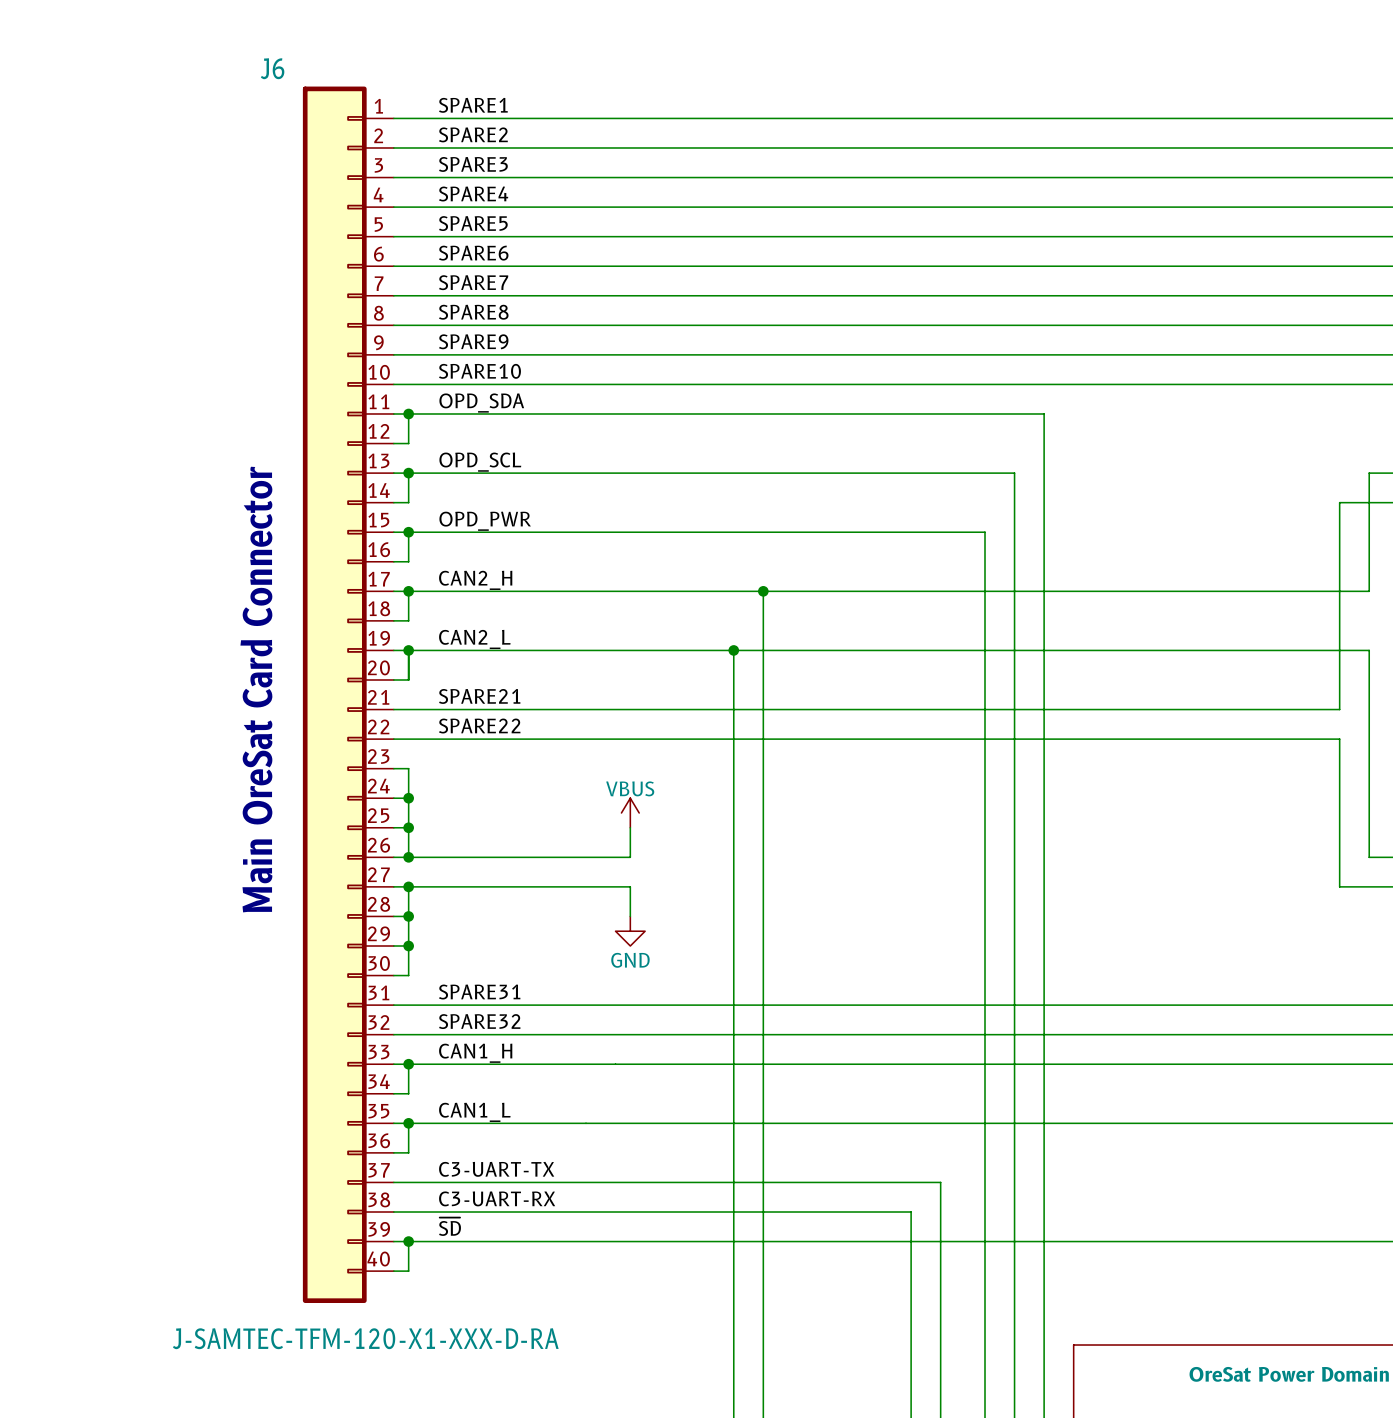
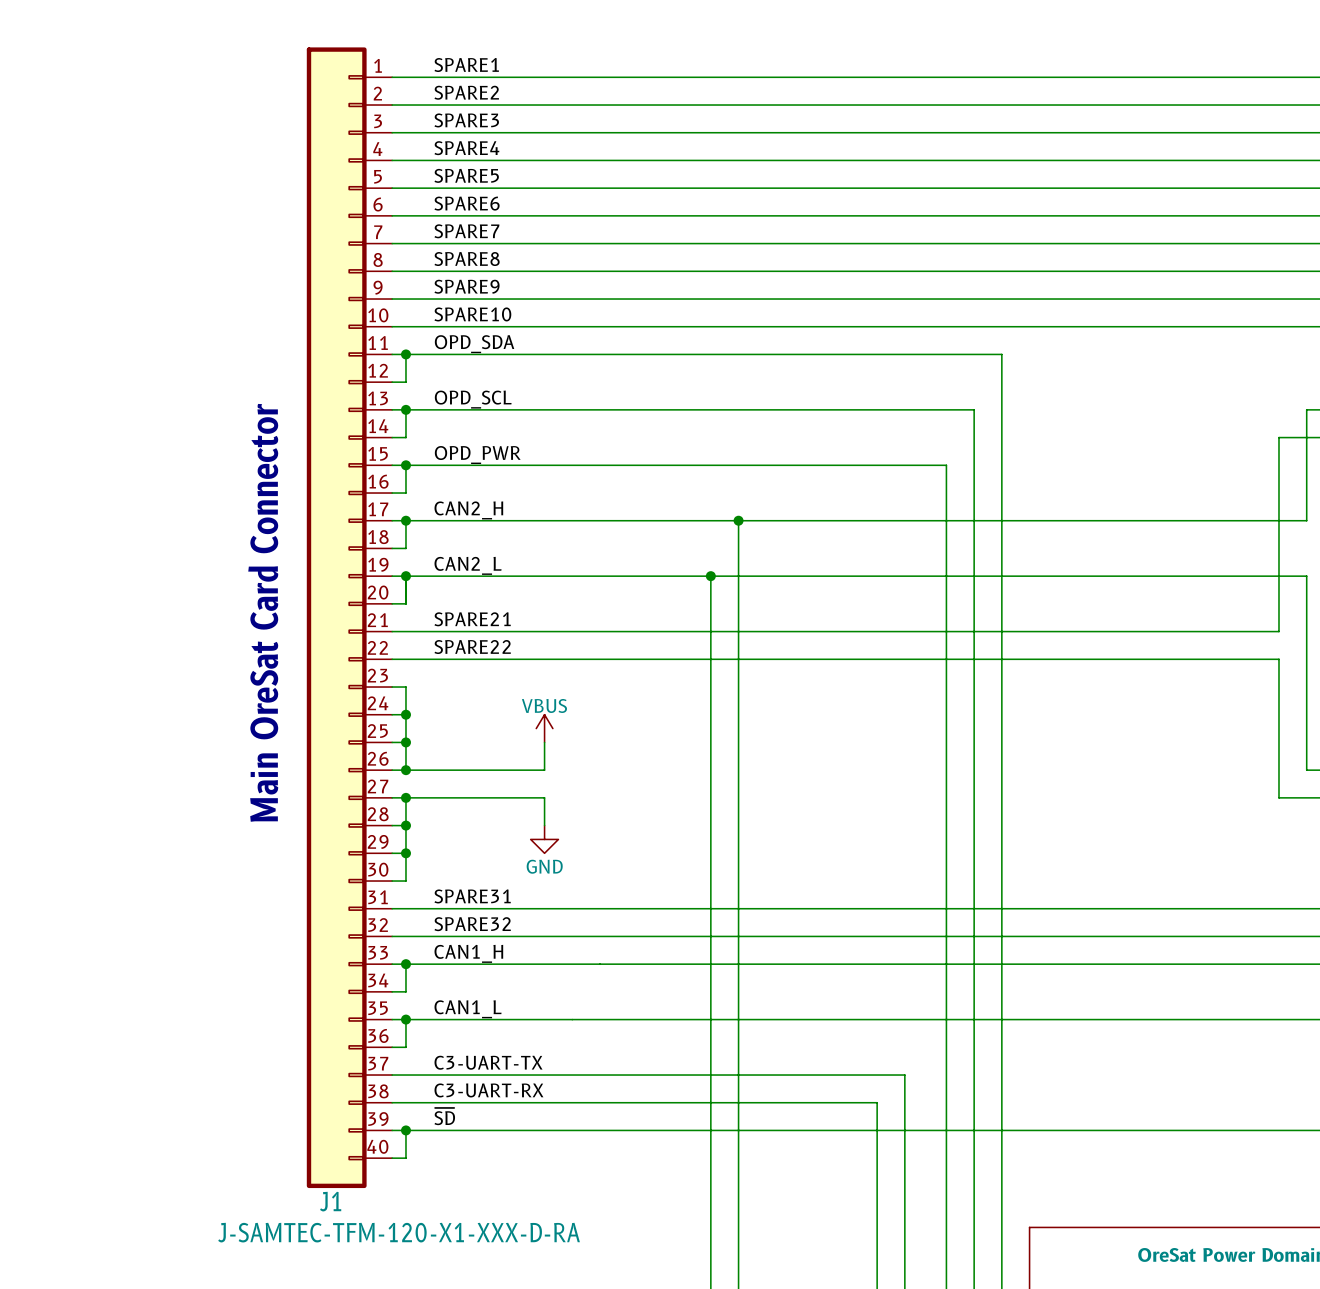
J6 name: J6 (272, 68) -> J1 (330, 1201)
power symbol position: VBUS (630, 813) -> VBUS (544, 728)
wire: (630, 827) (630, 857) (556, 857) -> (544, 742) (544, 770)
wire: (556, 886) (630, 886) (630, 916) -> (544, 797) (544, 825)
power symbol position: GND (630, 931) -> GND (544, 839)
J6 value position: J-SAMTEC-TFM-120-X1-XXX-D-RA (365, 1338) -> J-SAMTEC-TFM-120-X1-XXX-D-RA (399, 1232)

